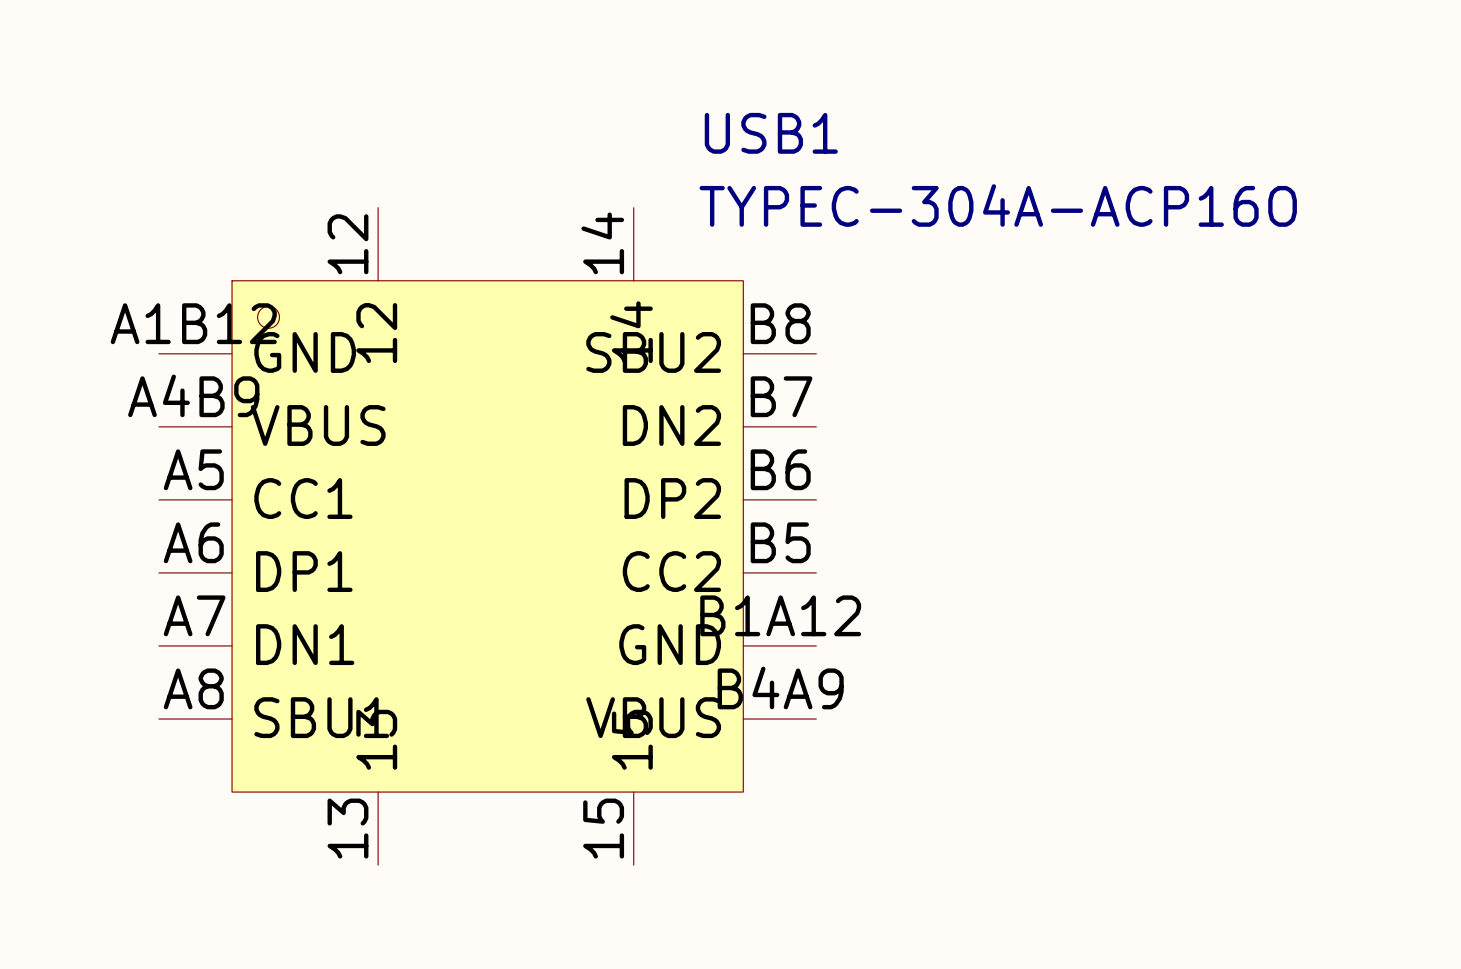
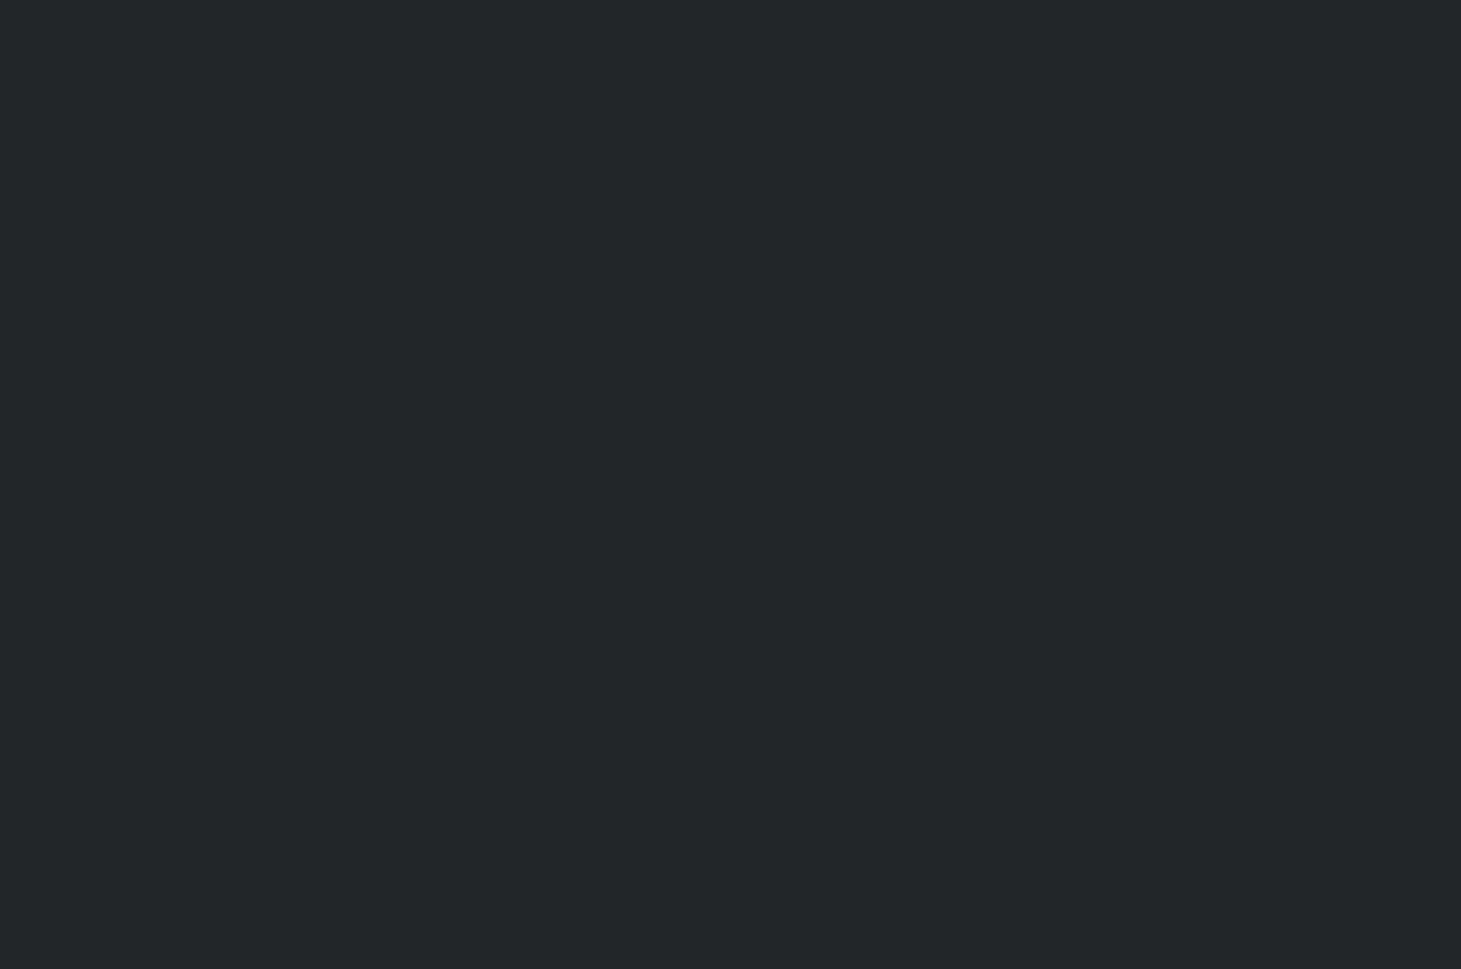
USB1: TYPEC-304A-ACP16O (487, 536) -> none

